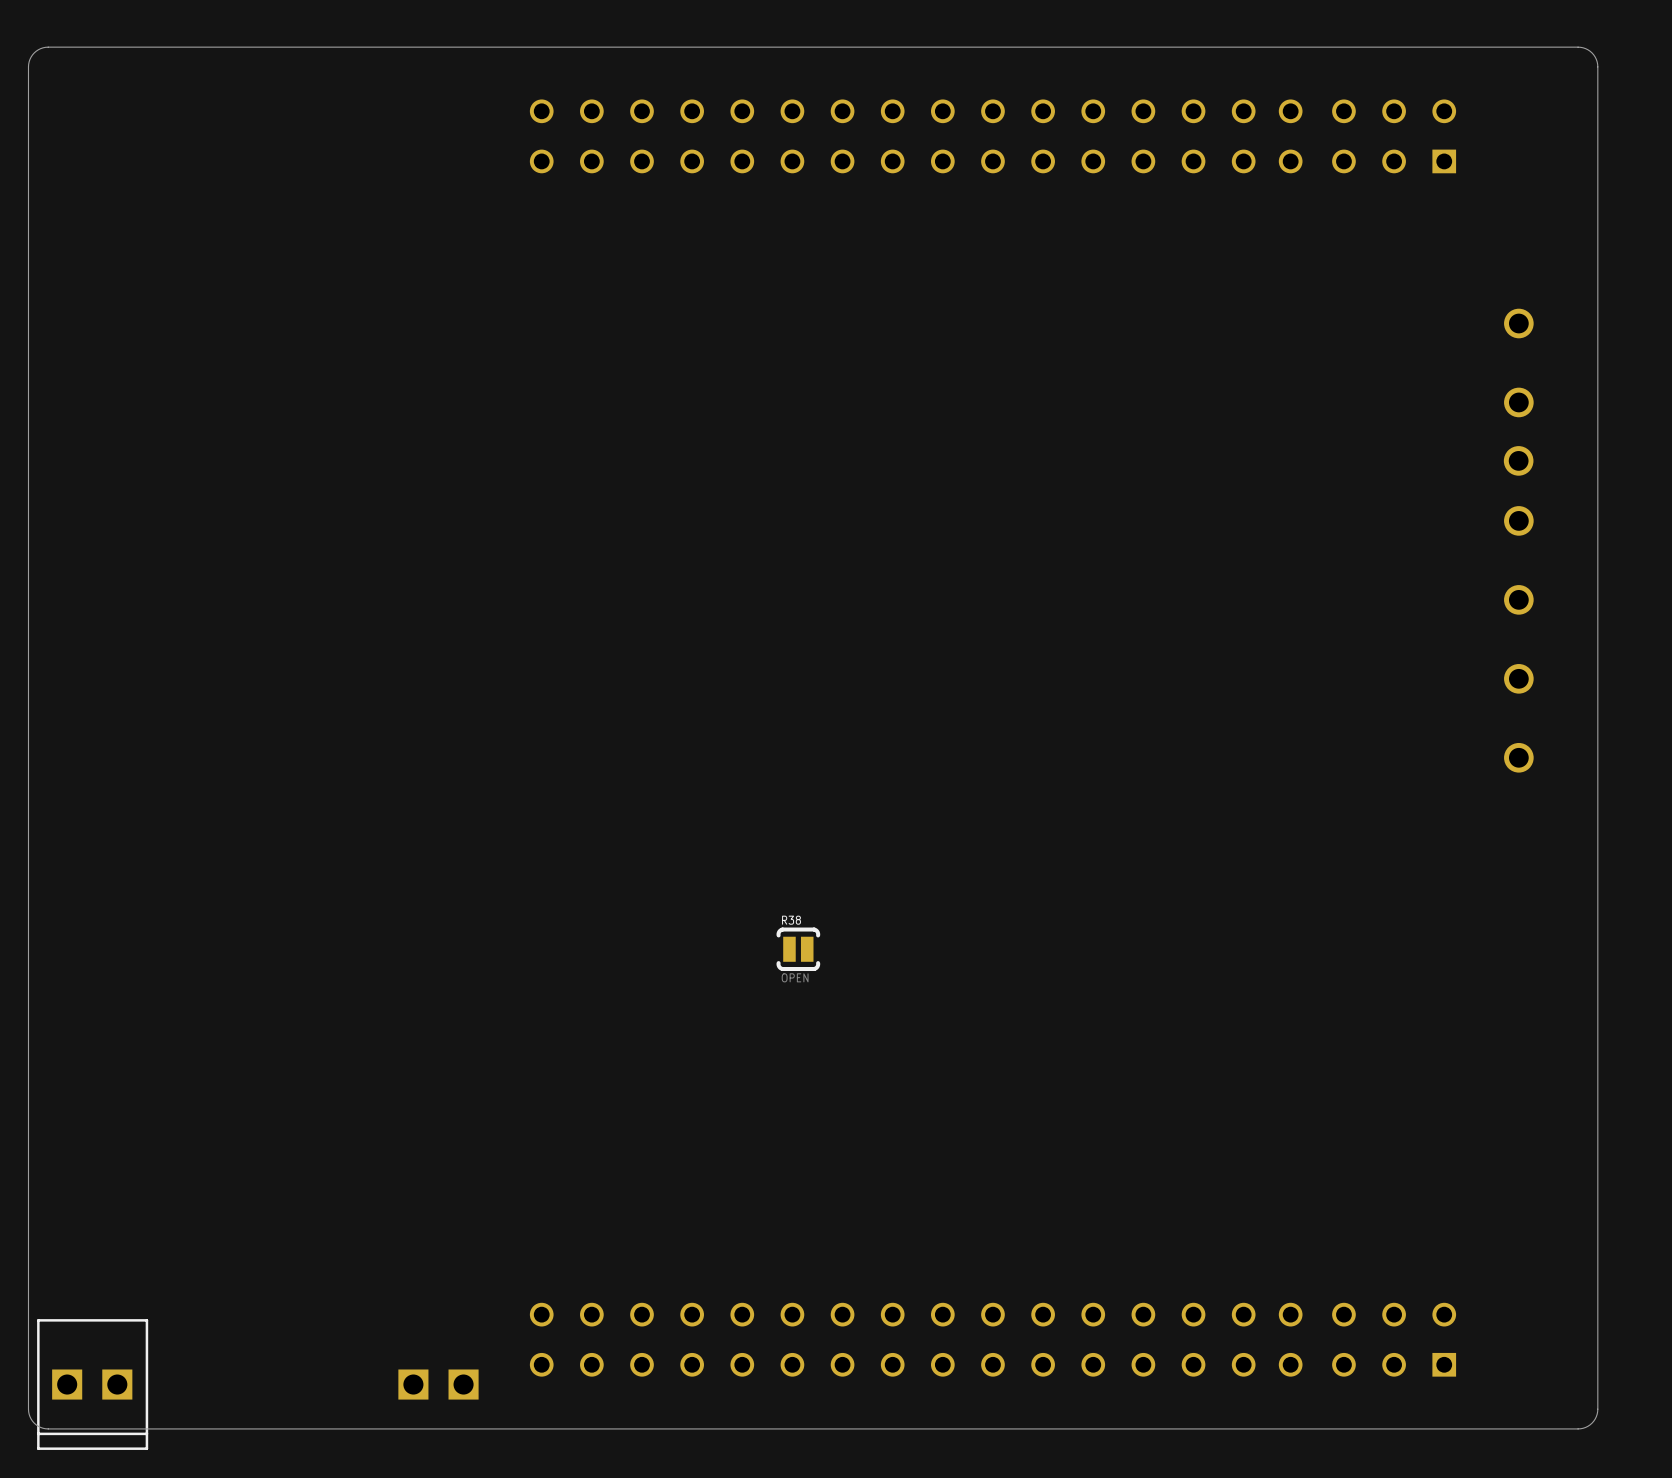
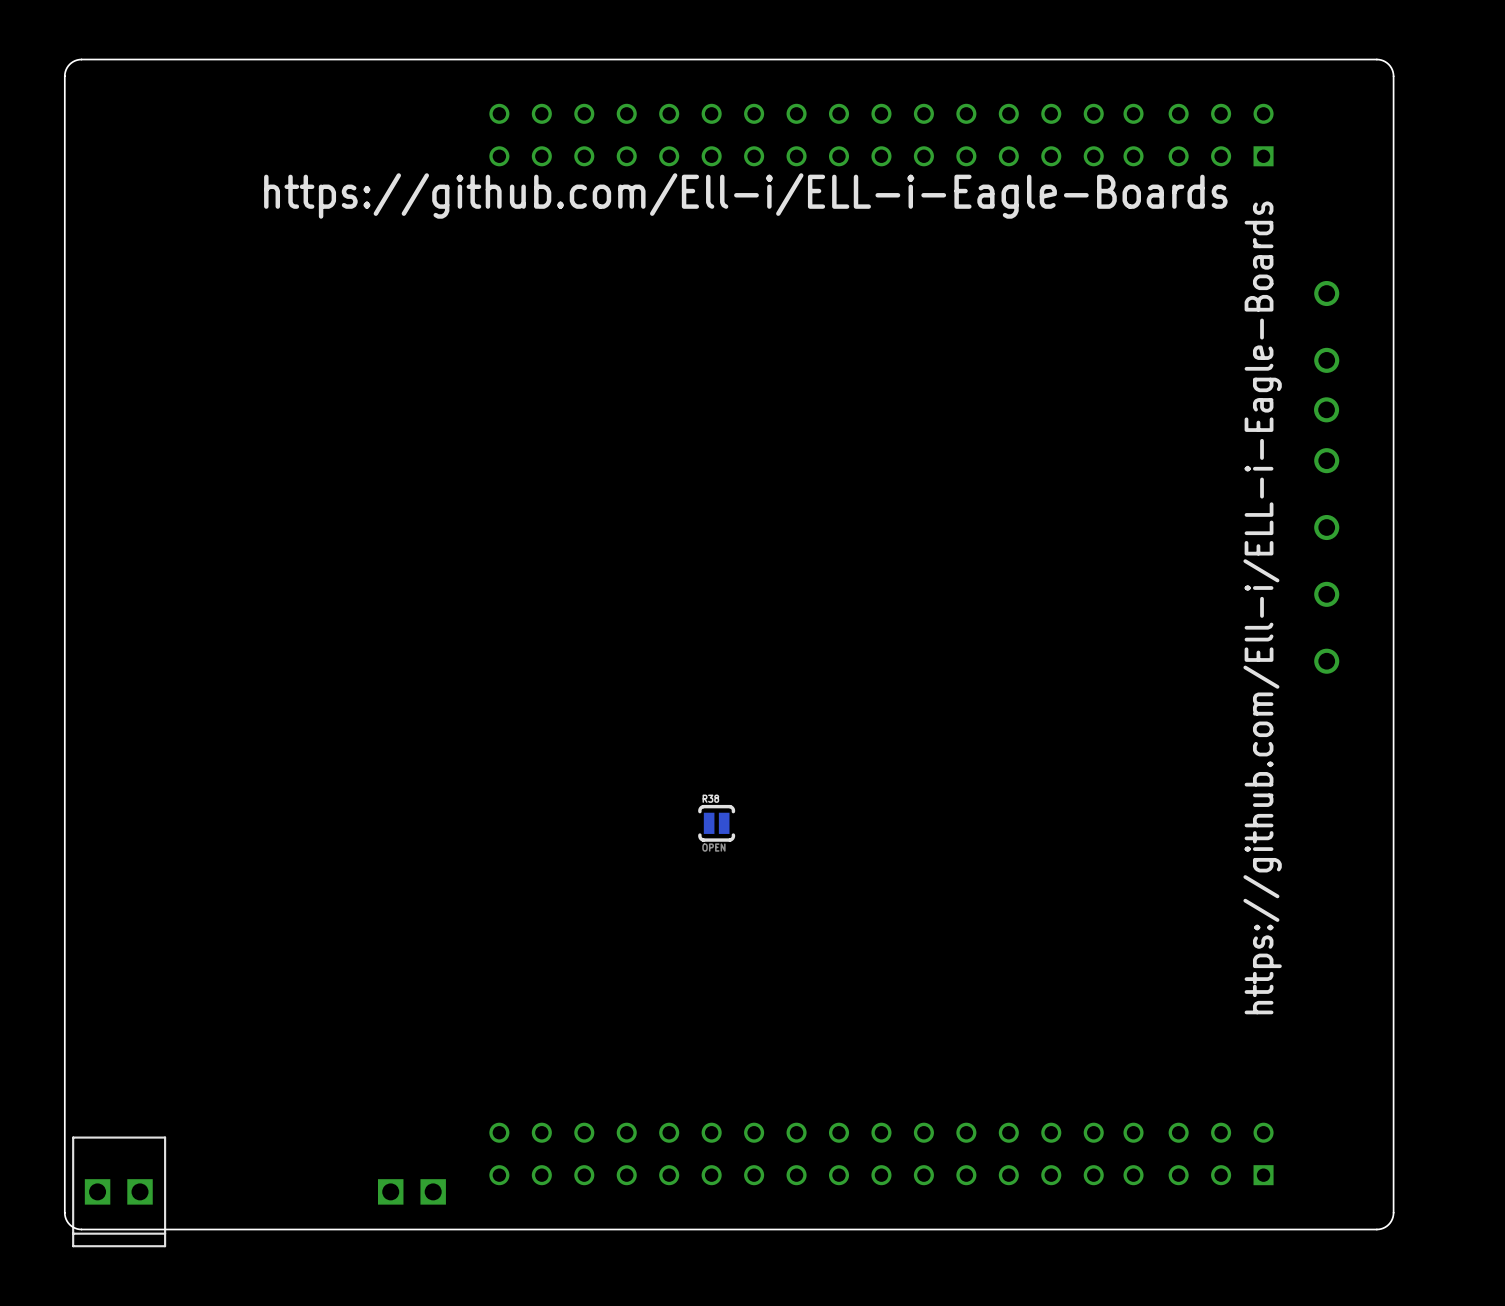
text: none -> https://github.com/Ell-i/ELL-i-Eagle-Boards (745, 195)
text: none -> https://github.com/Ell-i/ELL-i-Eagle-Boards (1262, 607)

